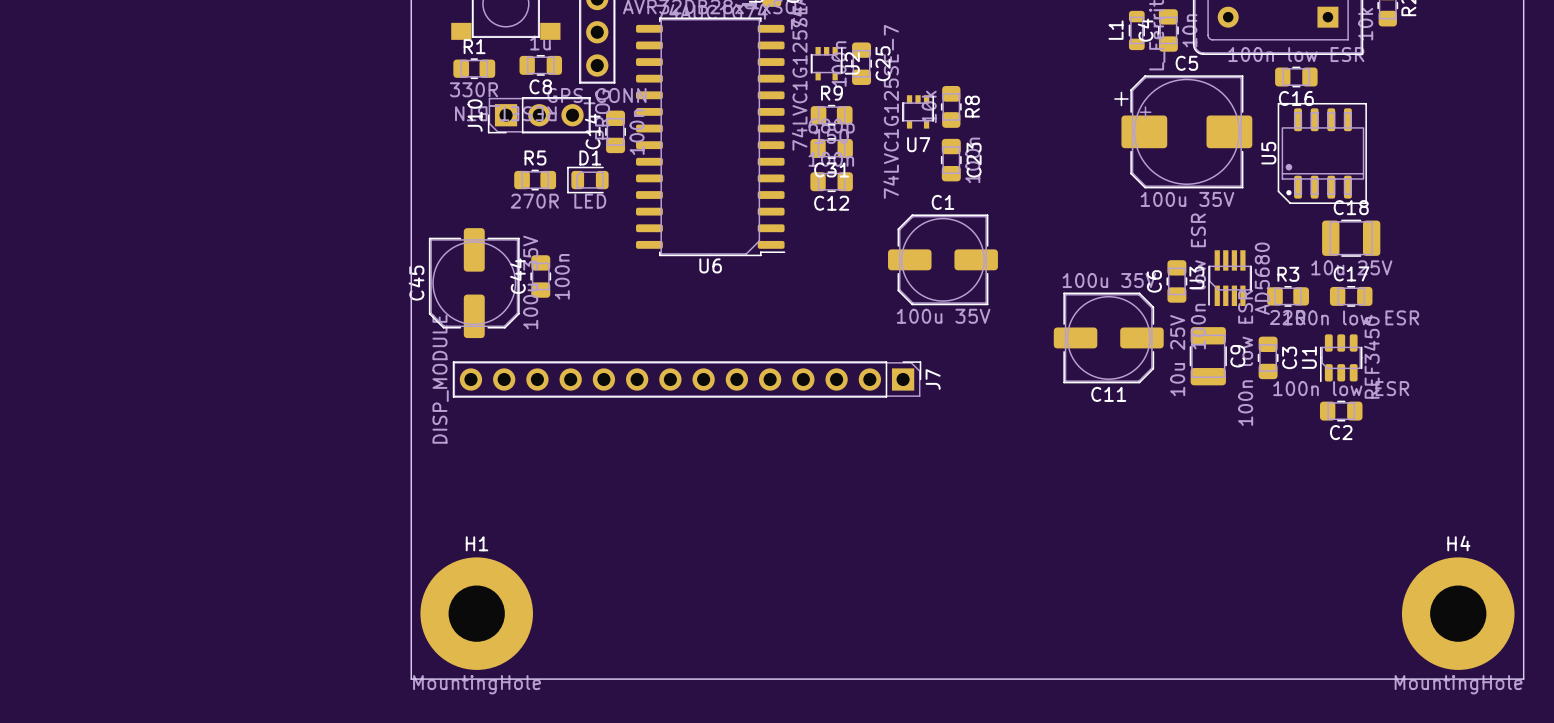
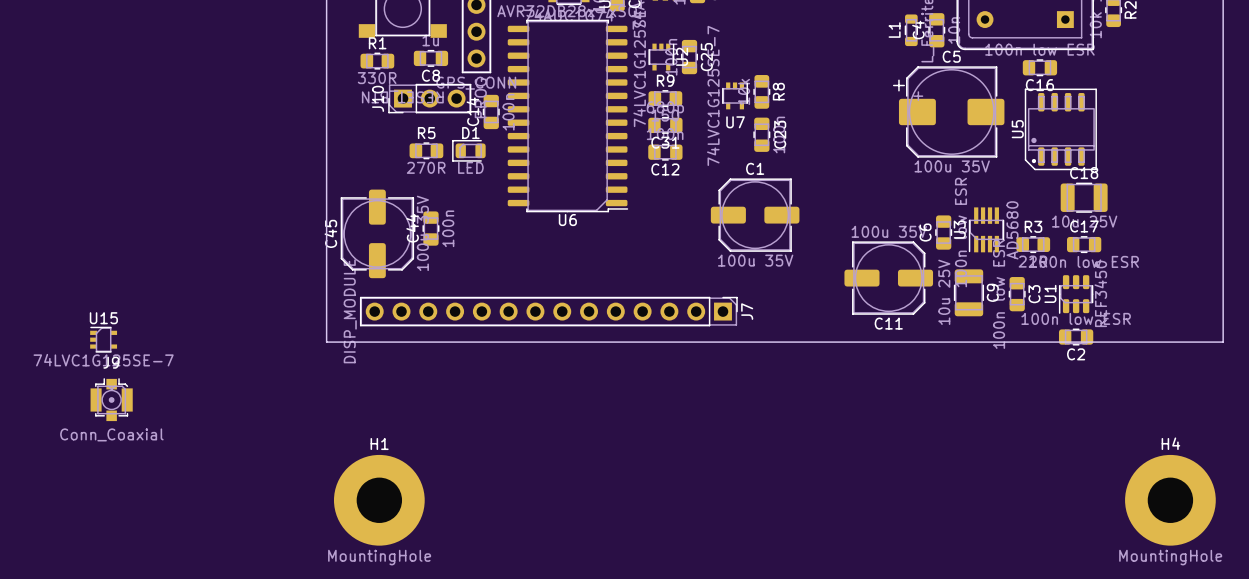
U15: none -> 74LVC1G125SE-7 (103, 339)
board edge: (411, 417) (411, 679) (1523, 679) (1523, 417) -> (326, 342) (1223, 342)
J9: none -> Conn_Coaxial (111, 399)

